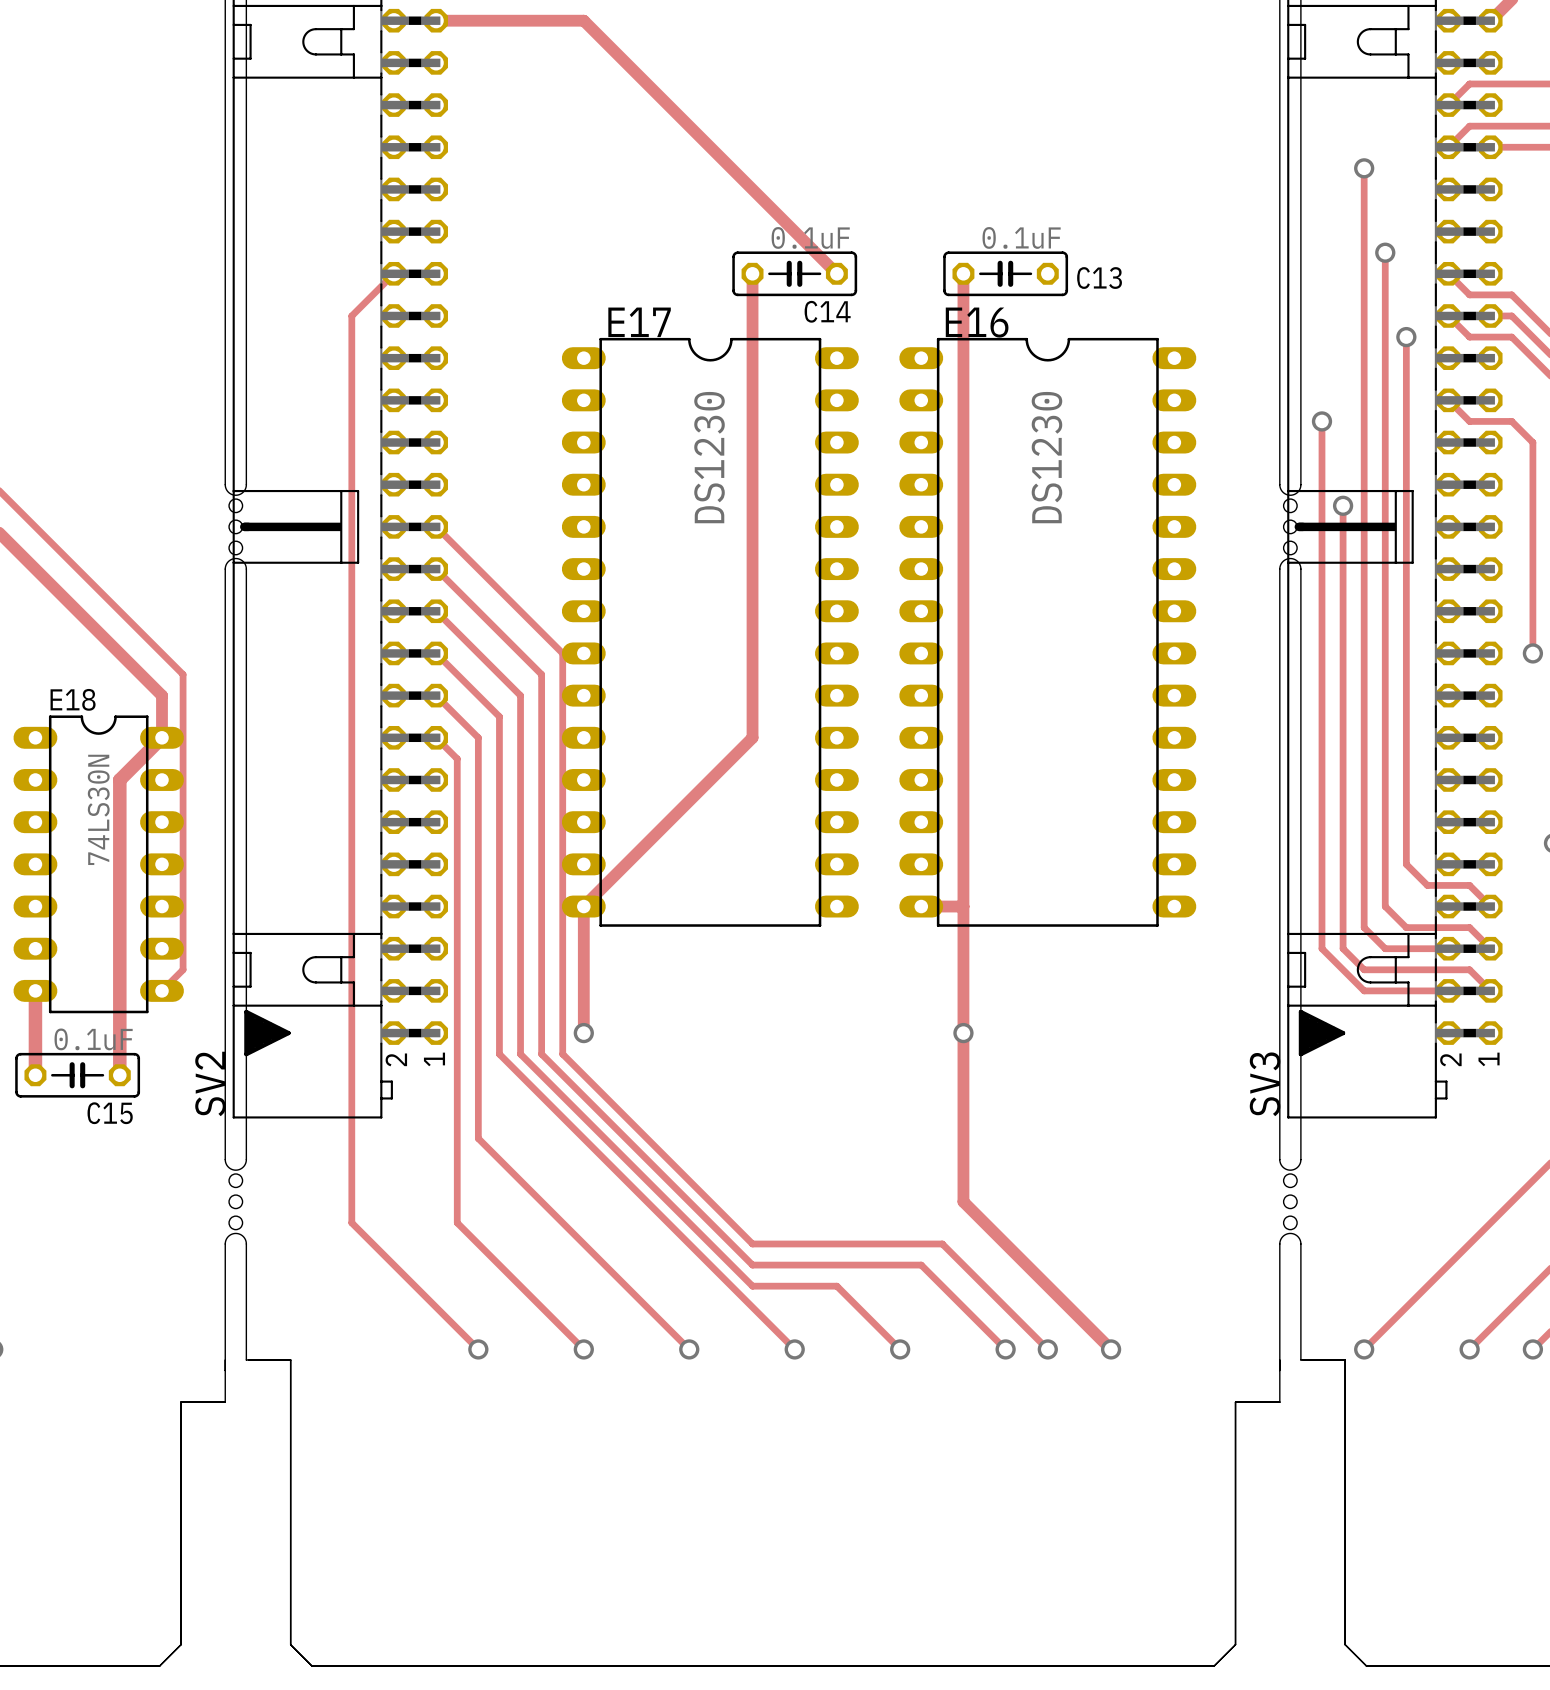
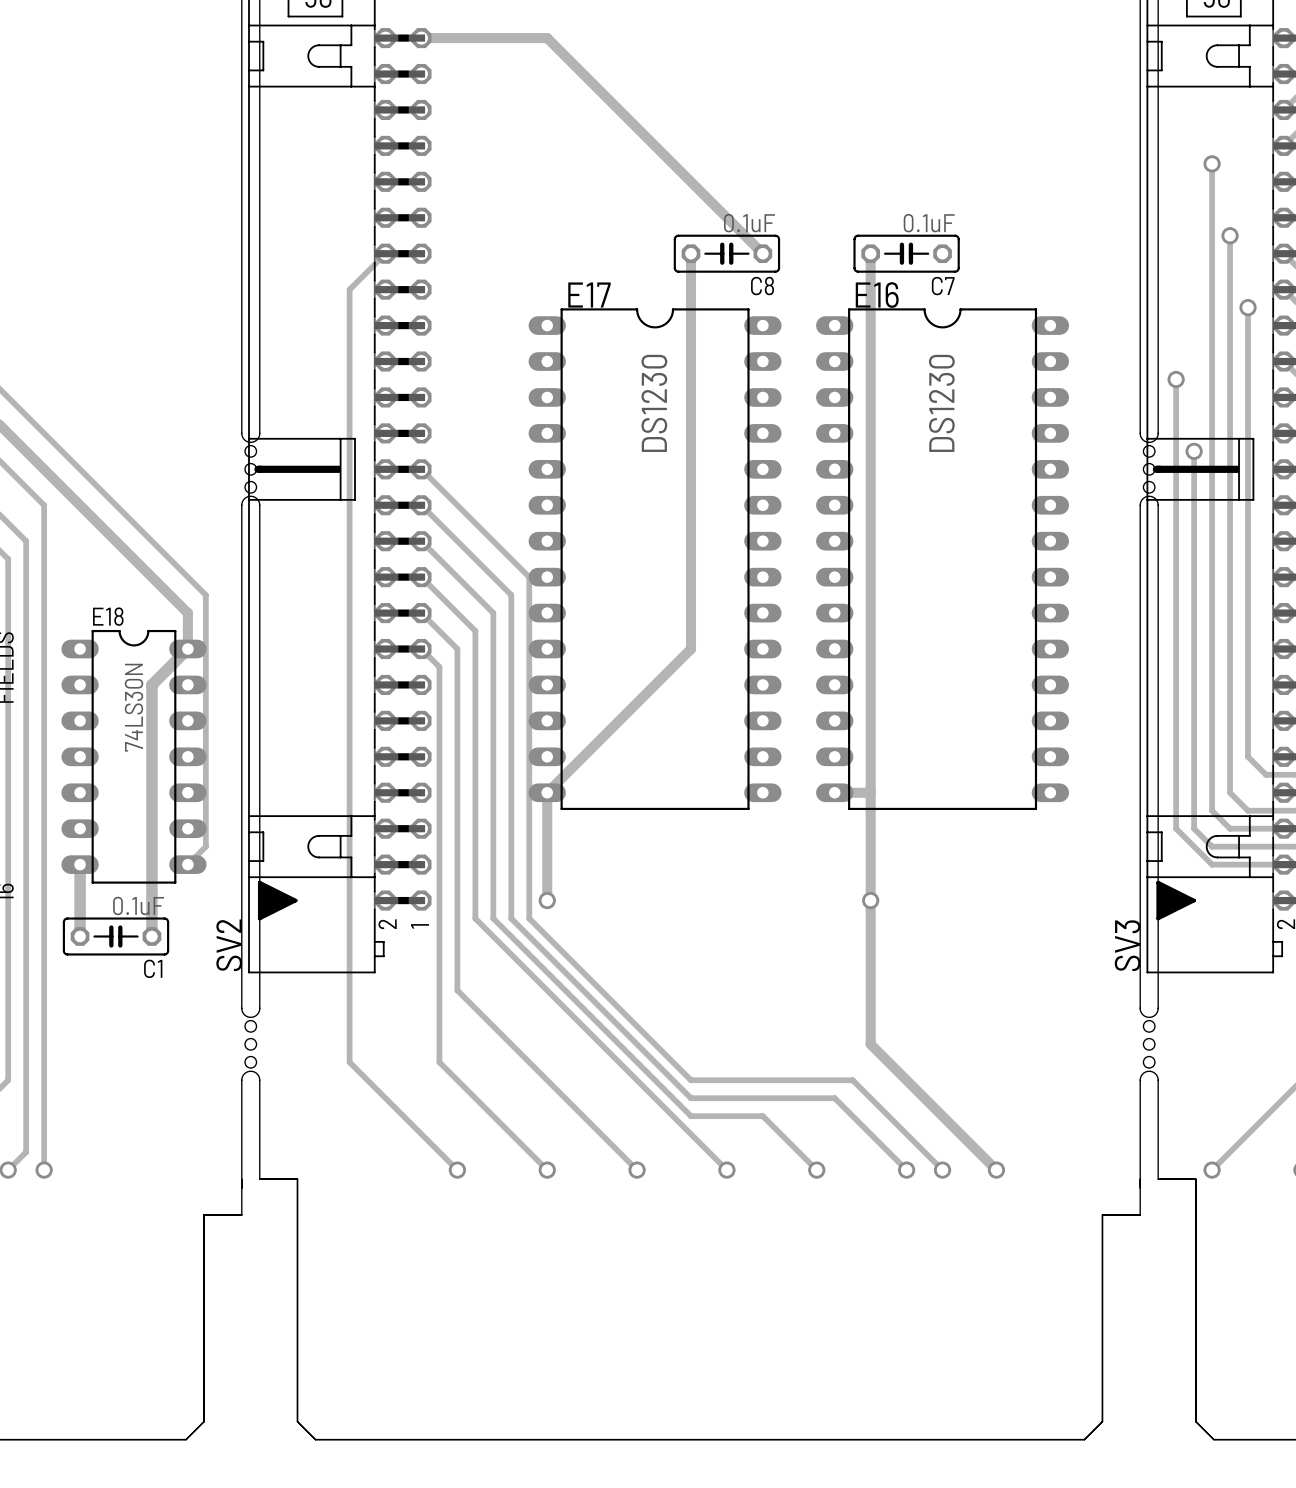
C13 name: C13 (1099, 278) -> C7 (943, 286)
C14 name: C14 (827, 311) -> C8 (762, 286)
C15 name: C15 (110, 1113) -> C1 (153, 968)

